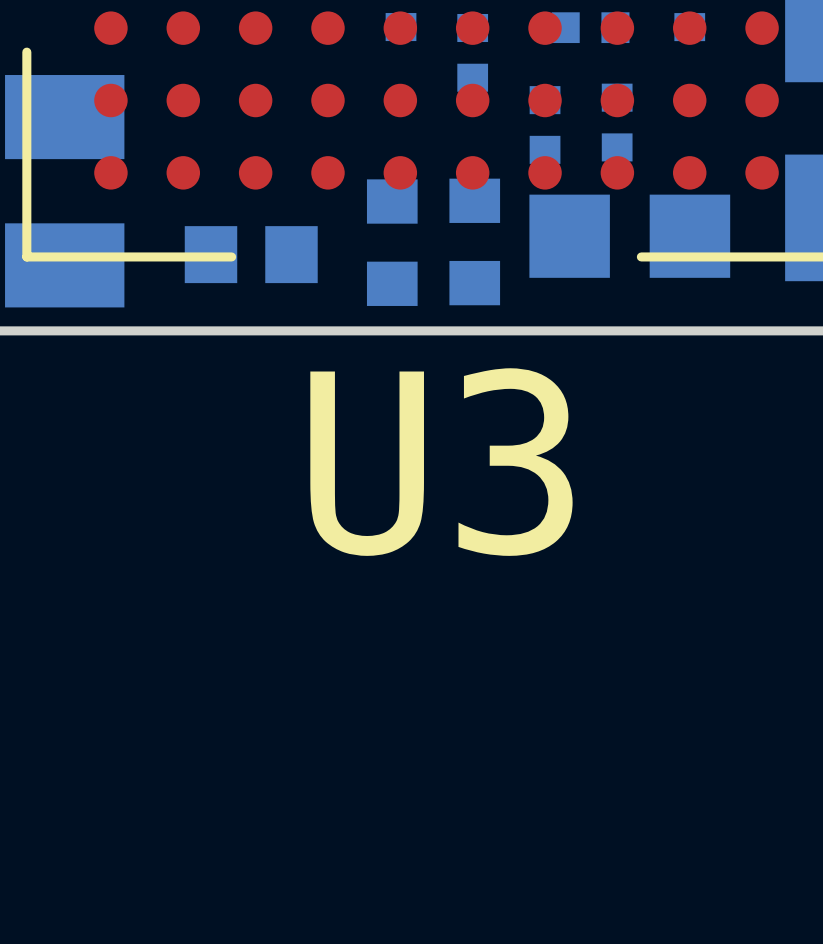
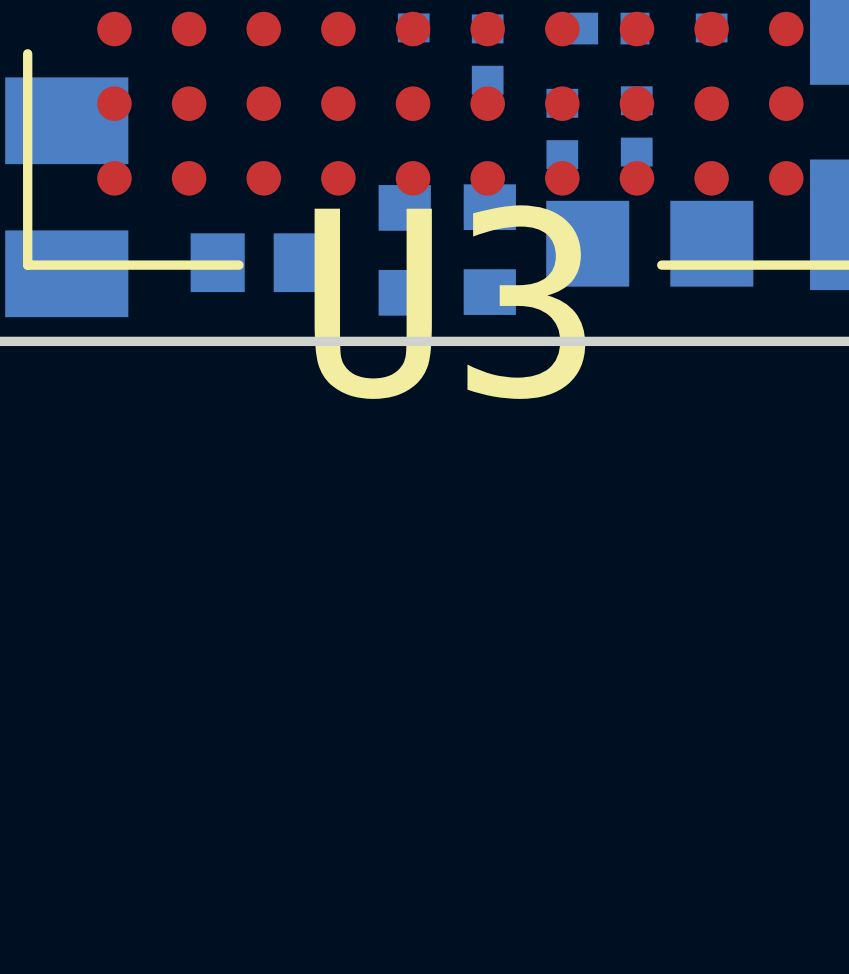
U3 name position: U3 (441, 462) -> U3 (449, 302)

